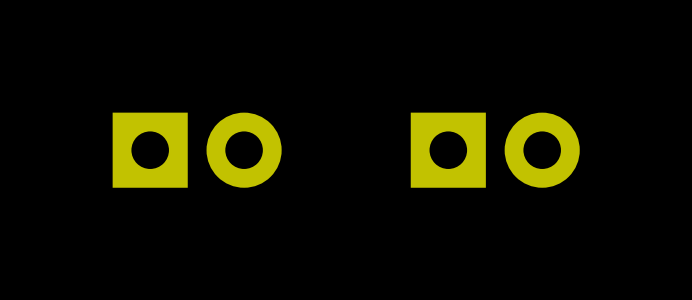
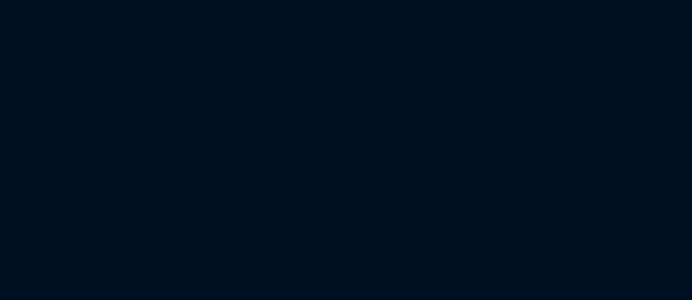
part: (197, 150) -> none
part: (495, 150) -> none

